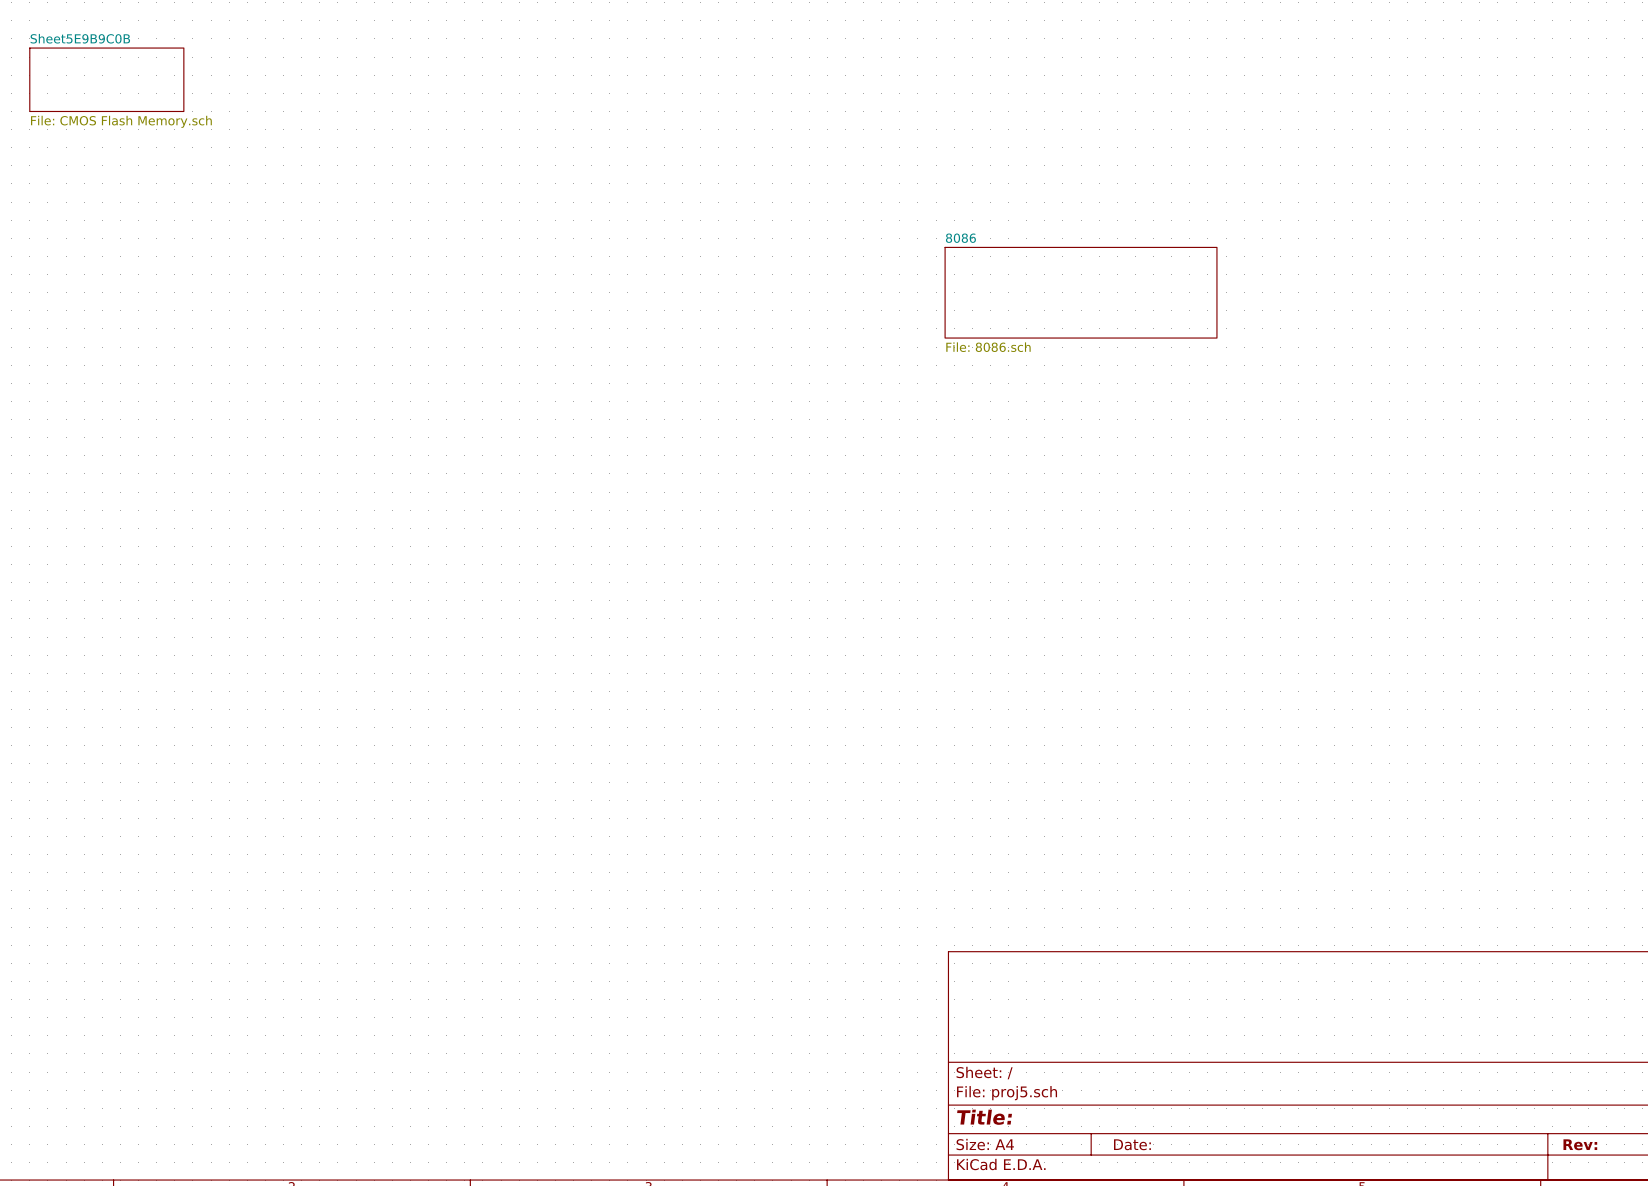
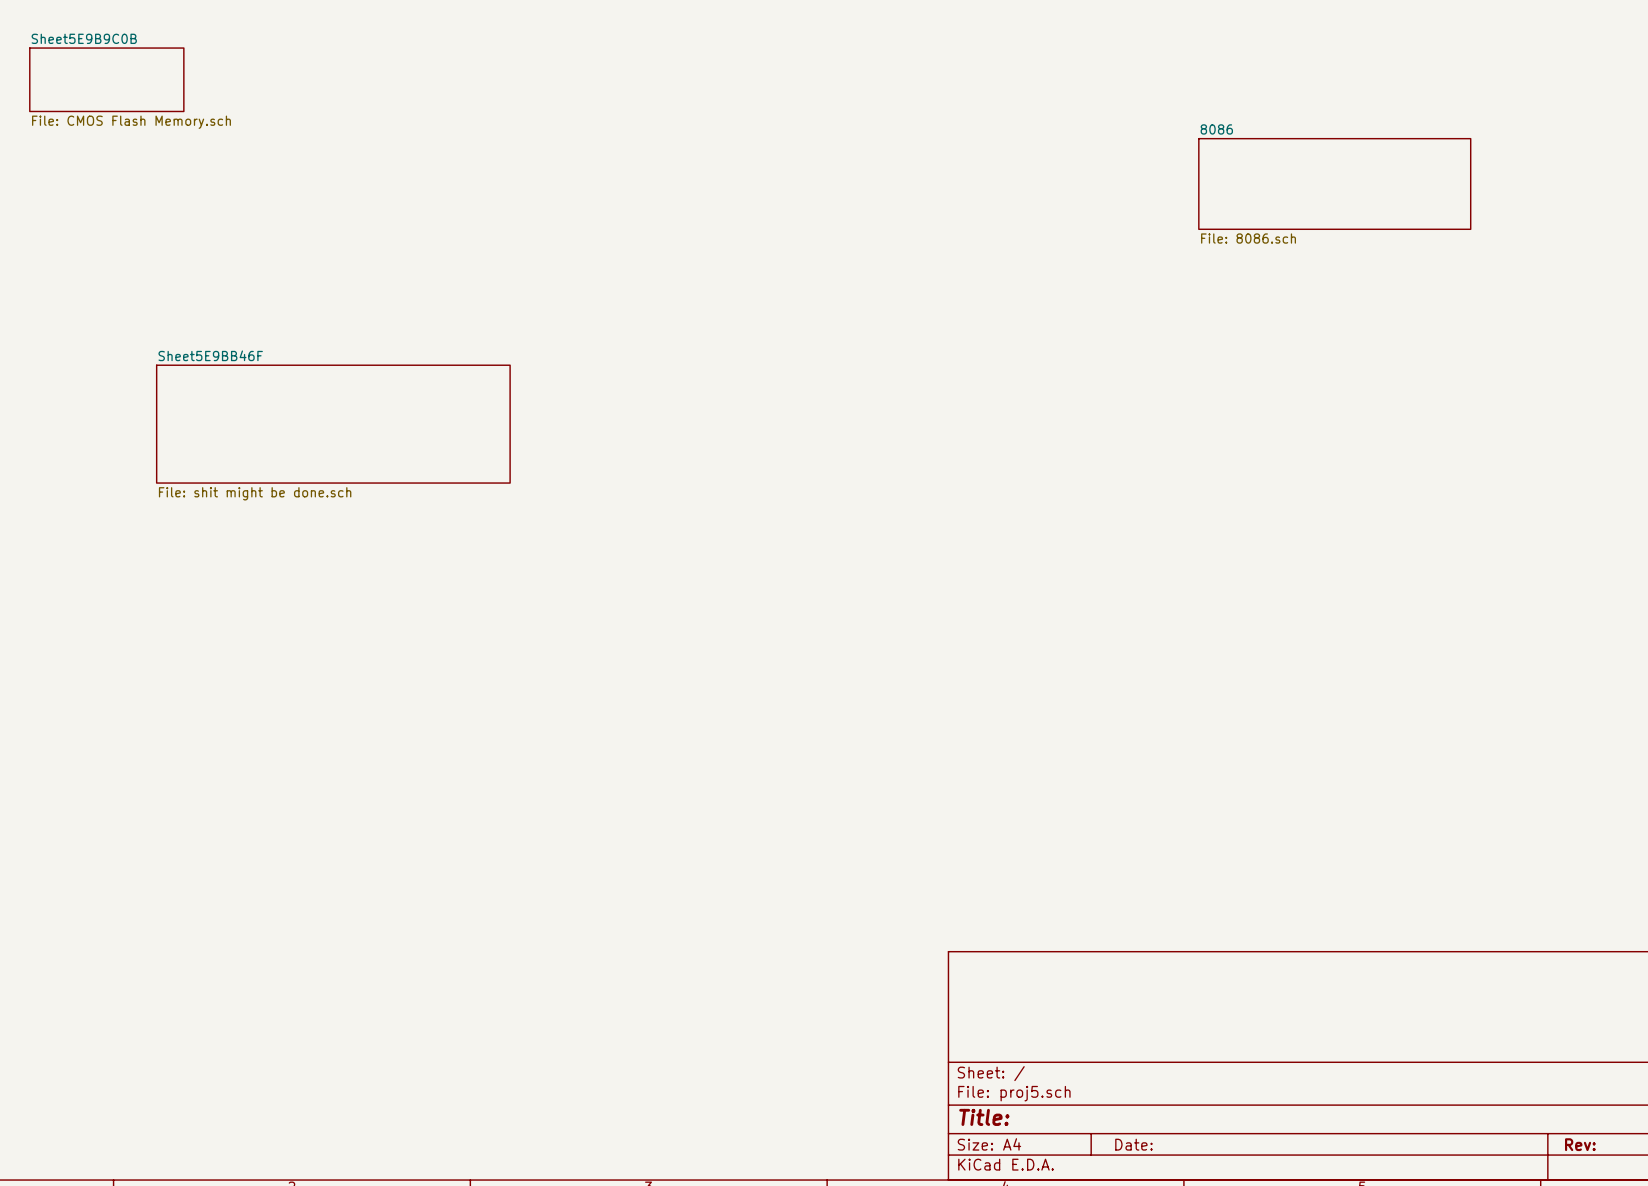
sheet 8086 position: (1081, 292) -> (1334, 183)
sheet Sheet5E9BB46F: none -> File: shit might be done.sch (333, 424)

